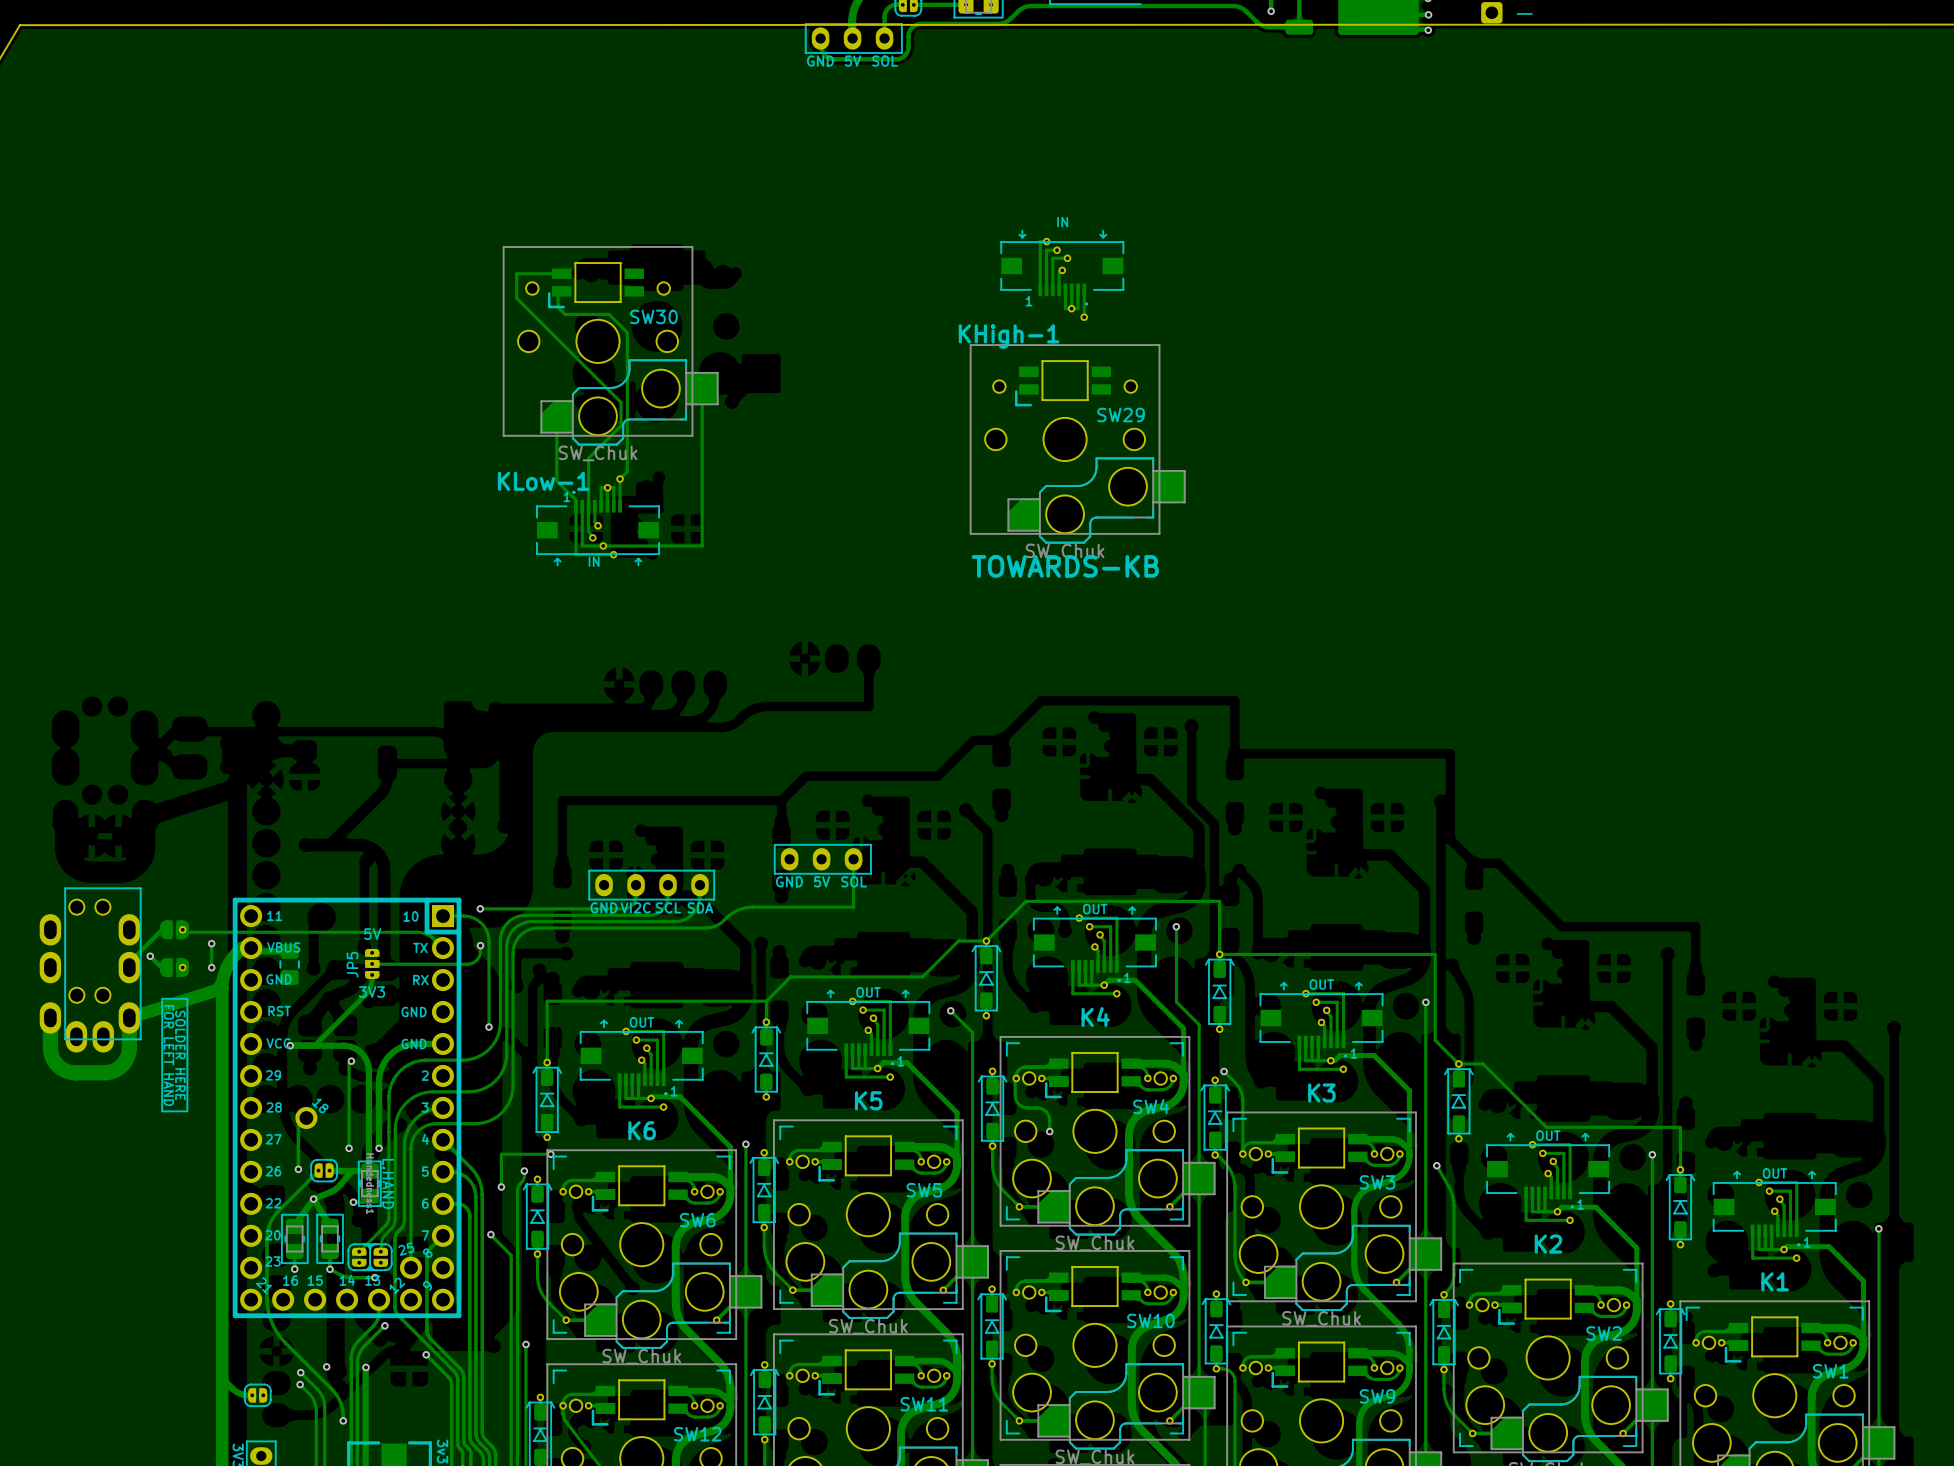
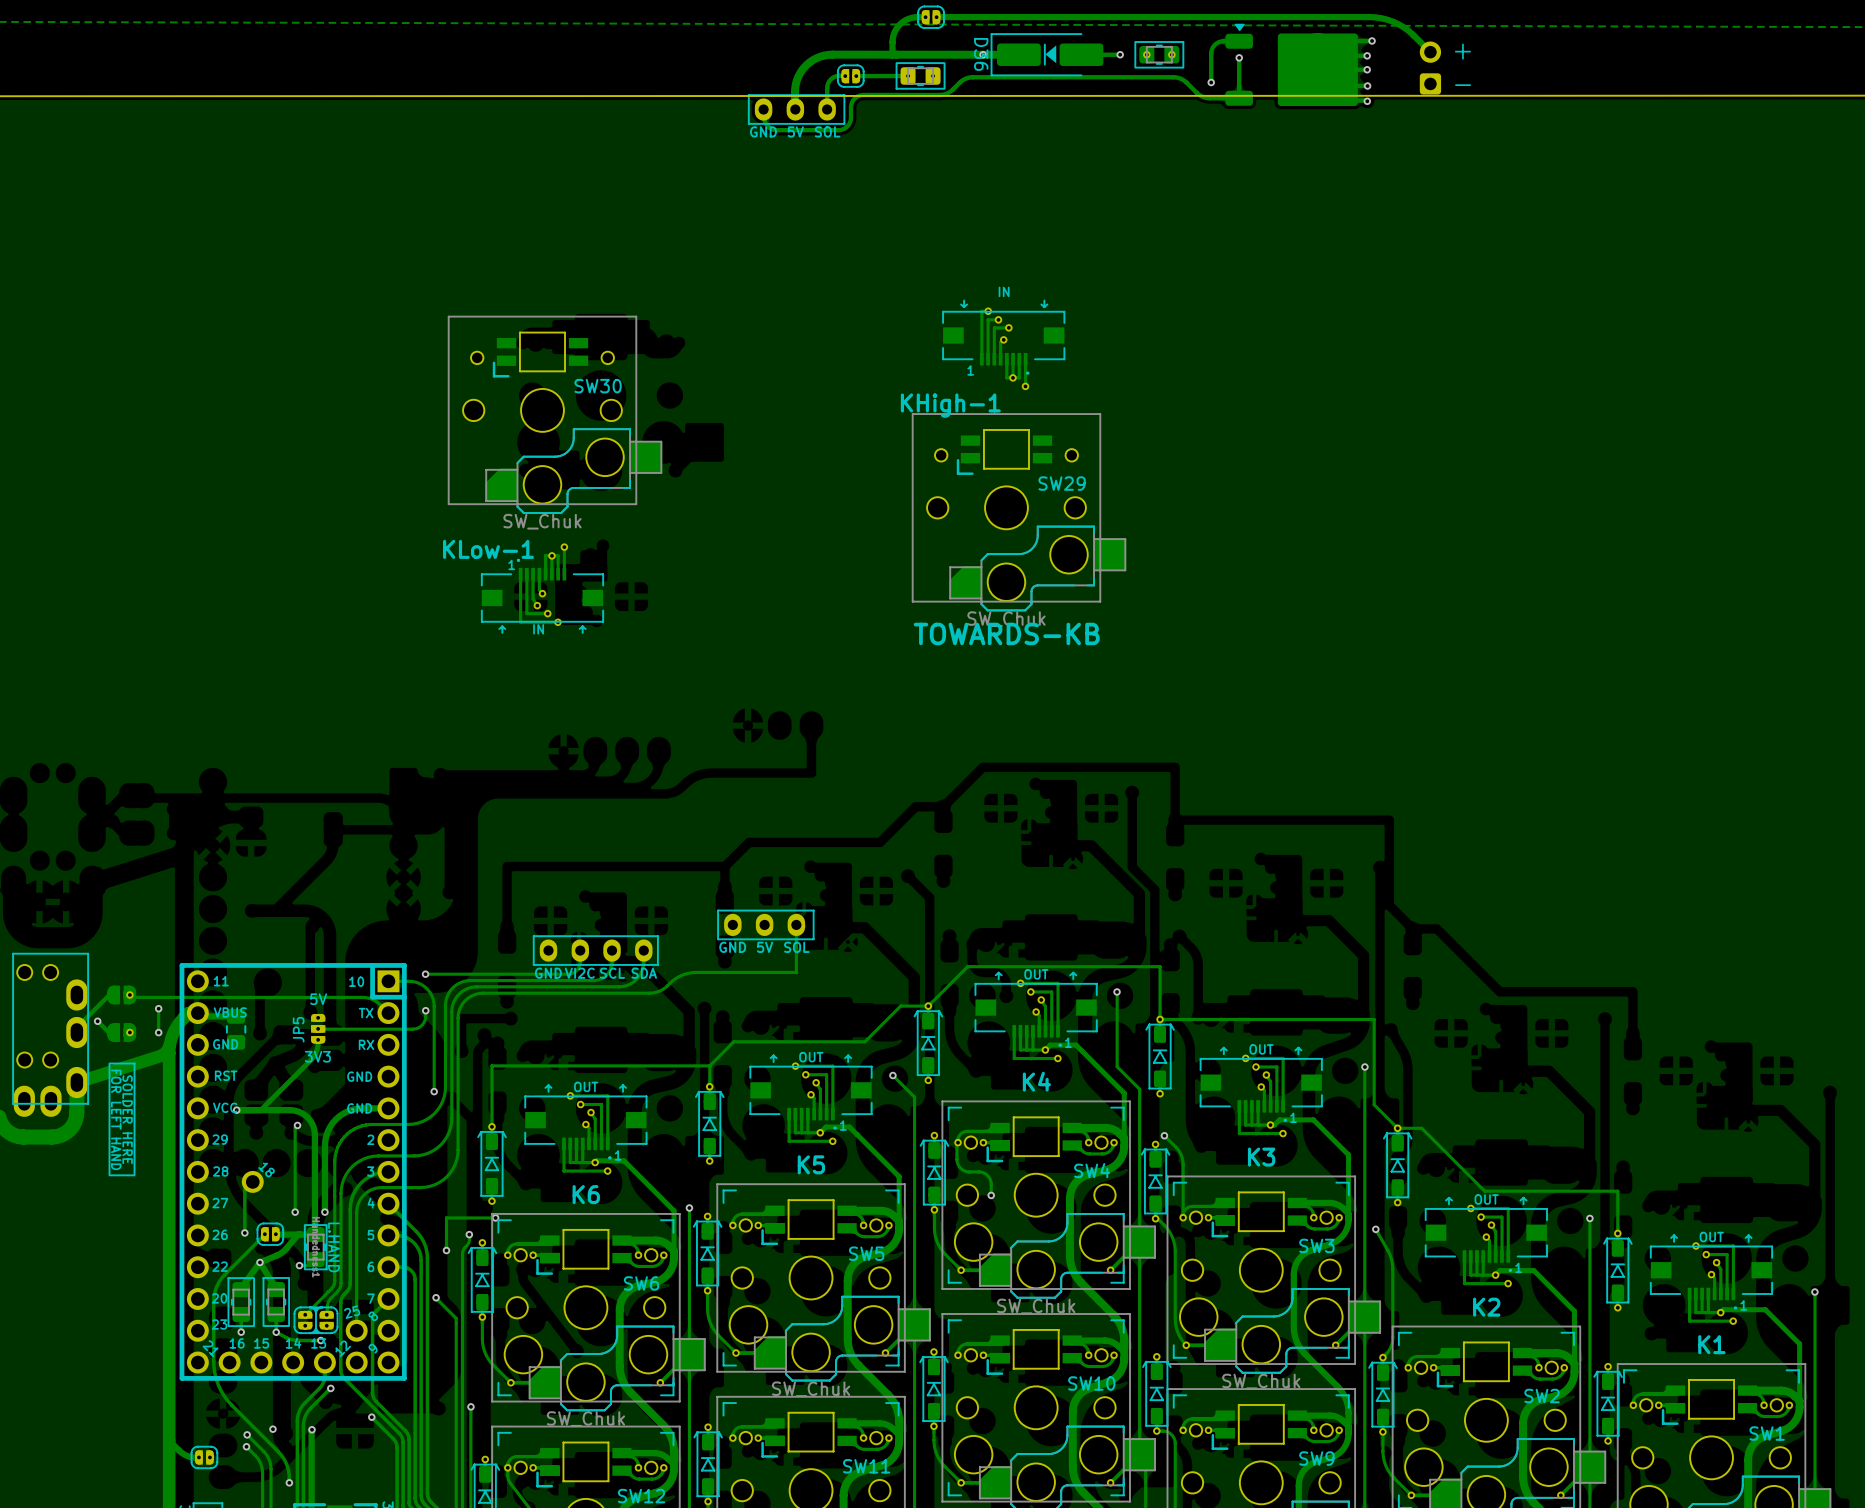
track: (561, 273) (516, 273) (516, 298) (621, 402) (621, 425) (588, 458) (588, 506) -> none
track: (561, 291) (557, 295) (557, 307) (565, 314) (609, 314) (627, 332) (627, 471) (620, 478) -> none
track: (702, 388) (702, 545) (603, 545) -> none
track: (556, 416) (556, 481) (575, 500) (575, 506) -> none

